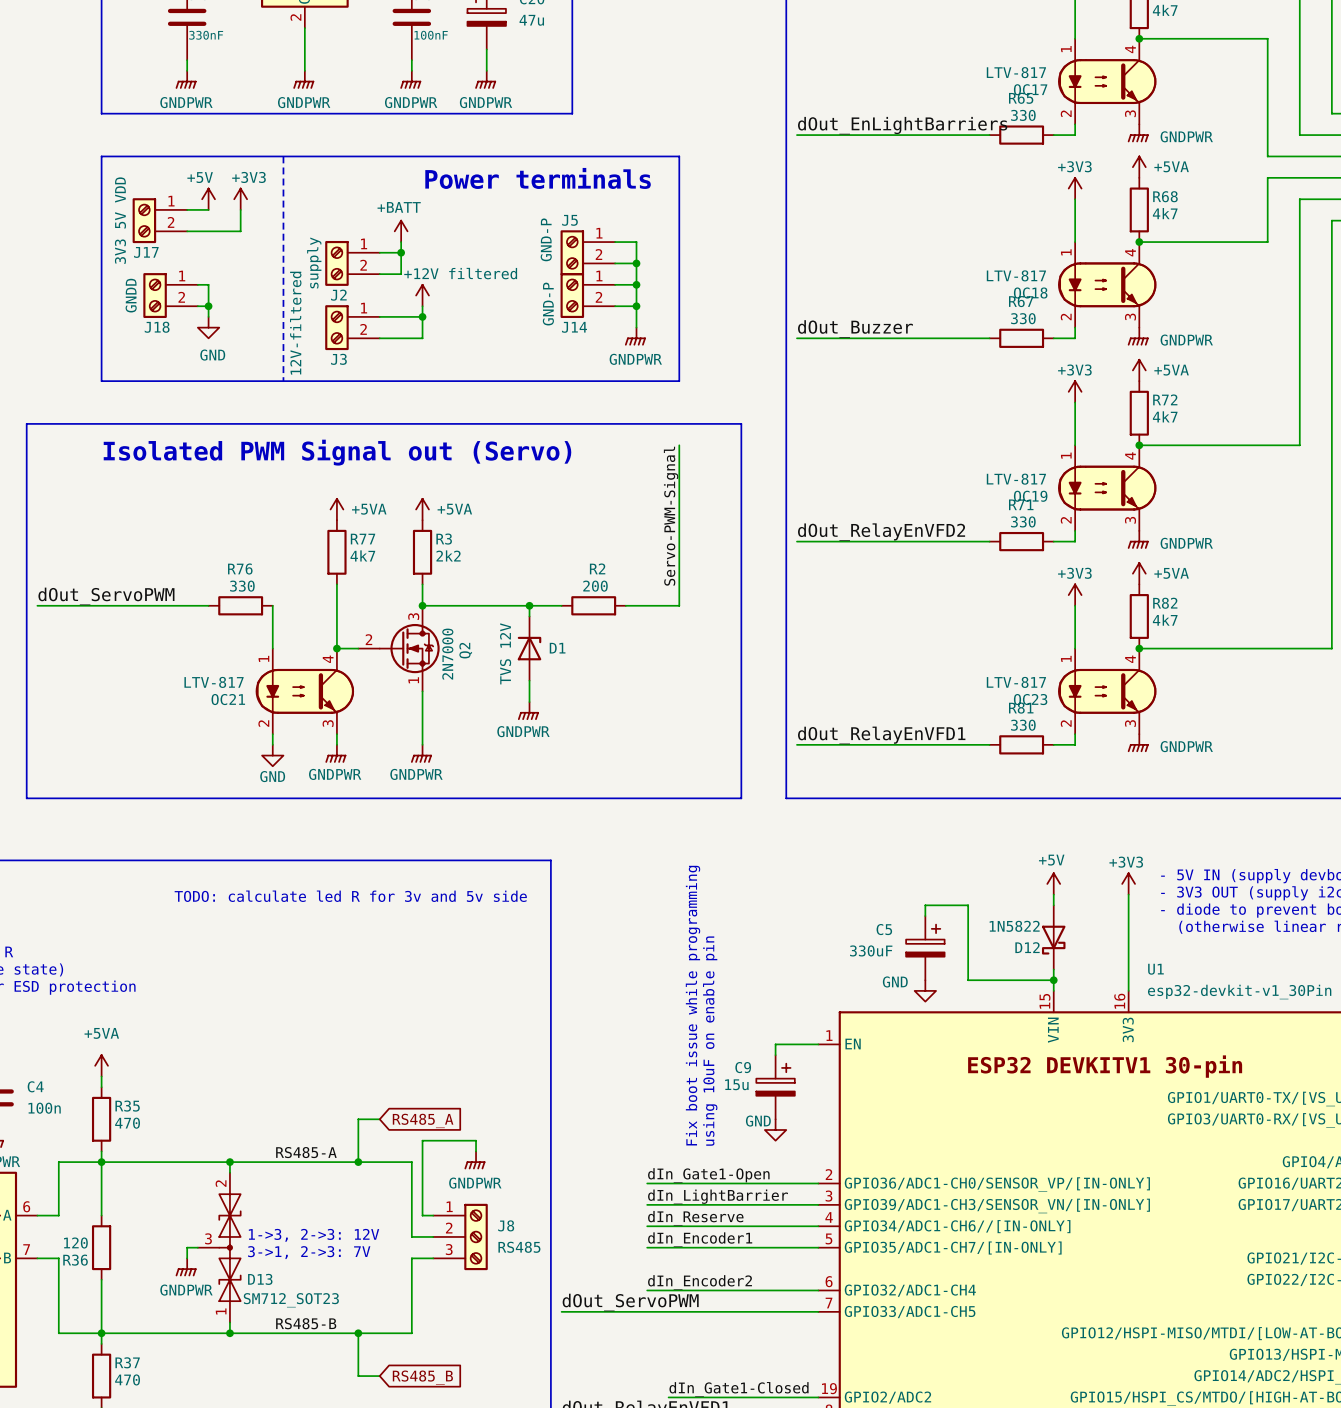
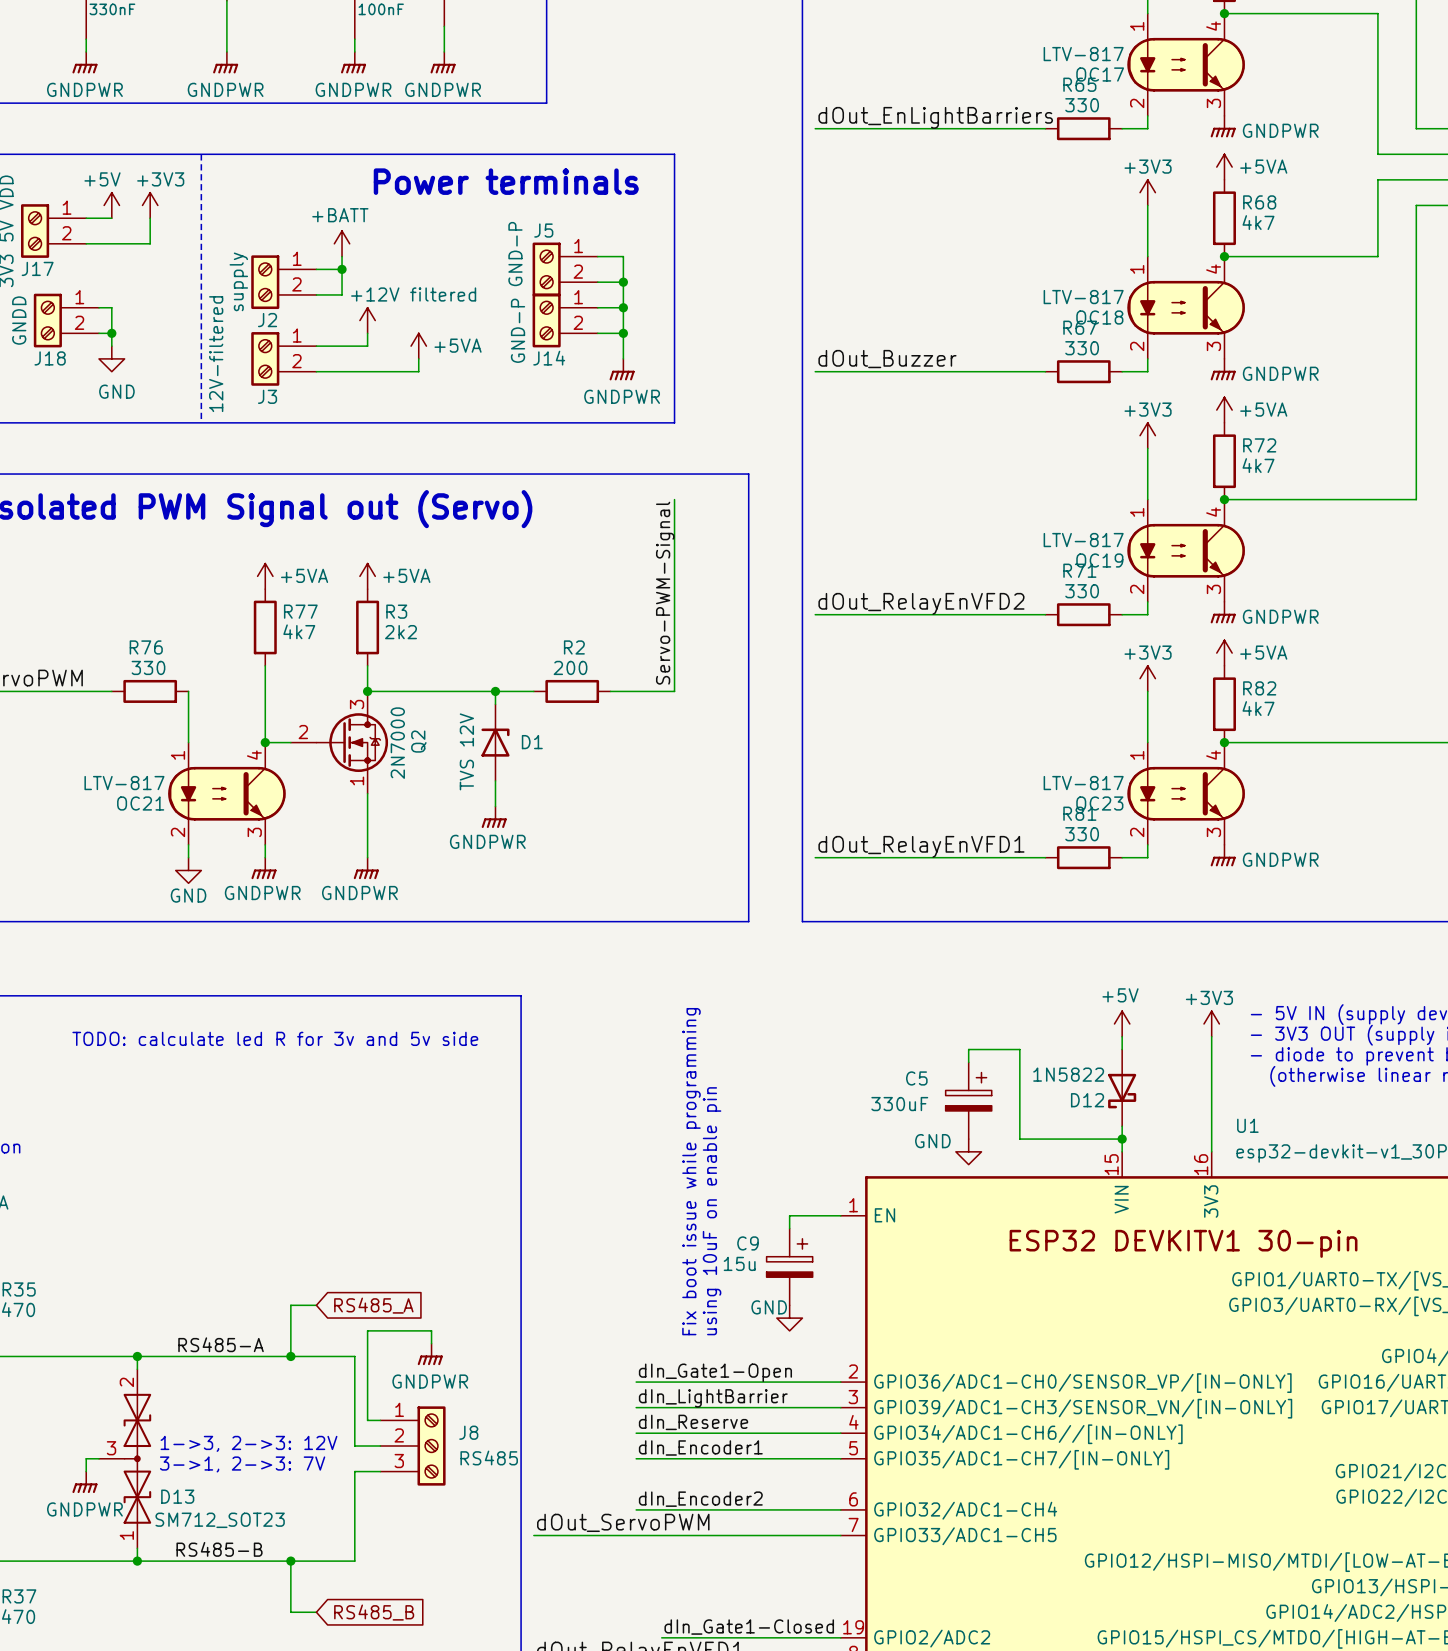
wire: (422, 316) (422, 338) -> (418, 358) (418, 371) (367, 371)
junction: (422, 316) -> none
power symbol: none -> +5VA (418, 346)

